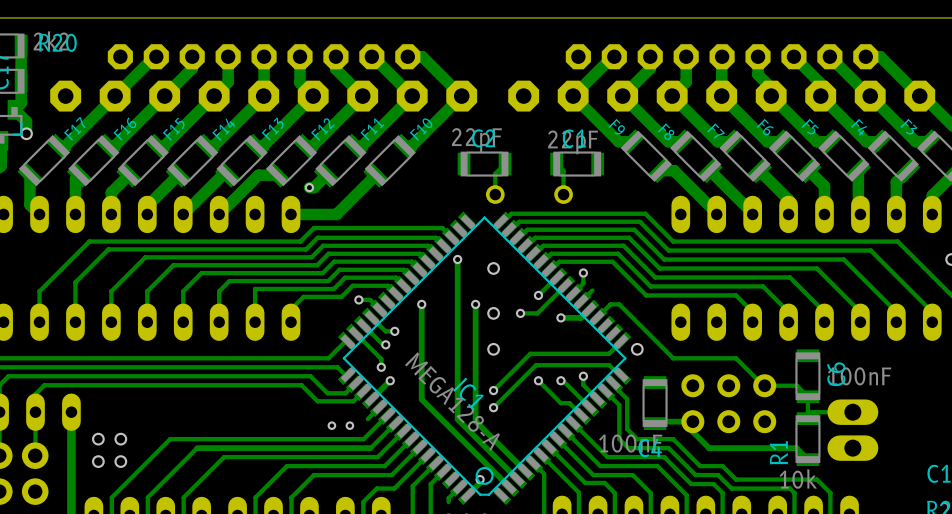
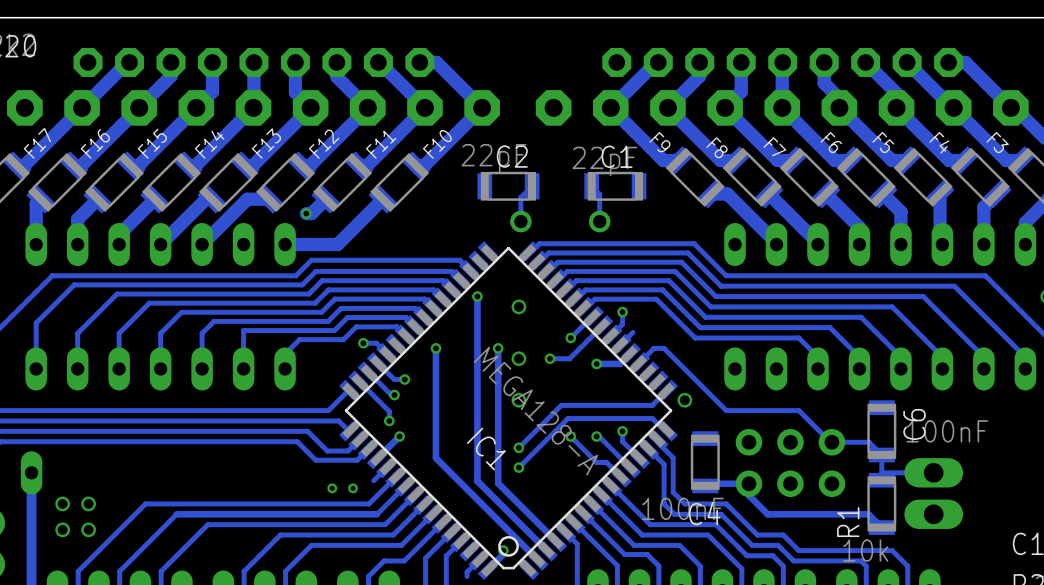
IC1 value position: MEGA128-A (452, 401) -> MEGA128-A (535, 411)

